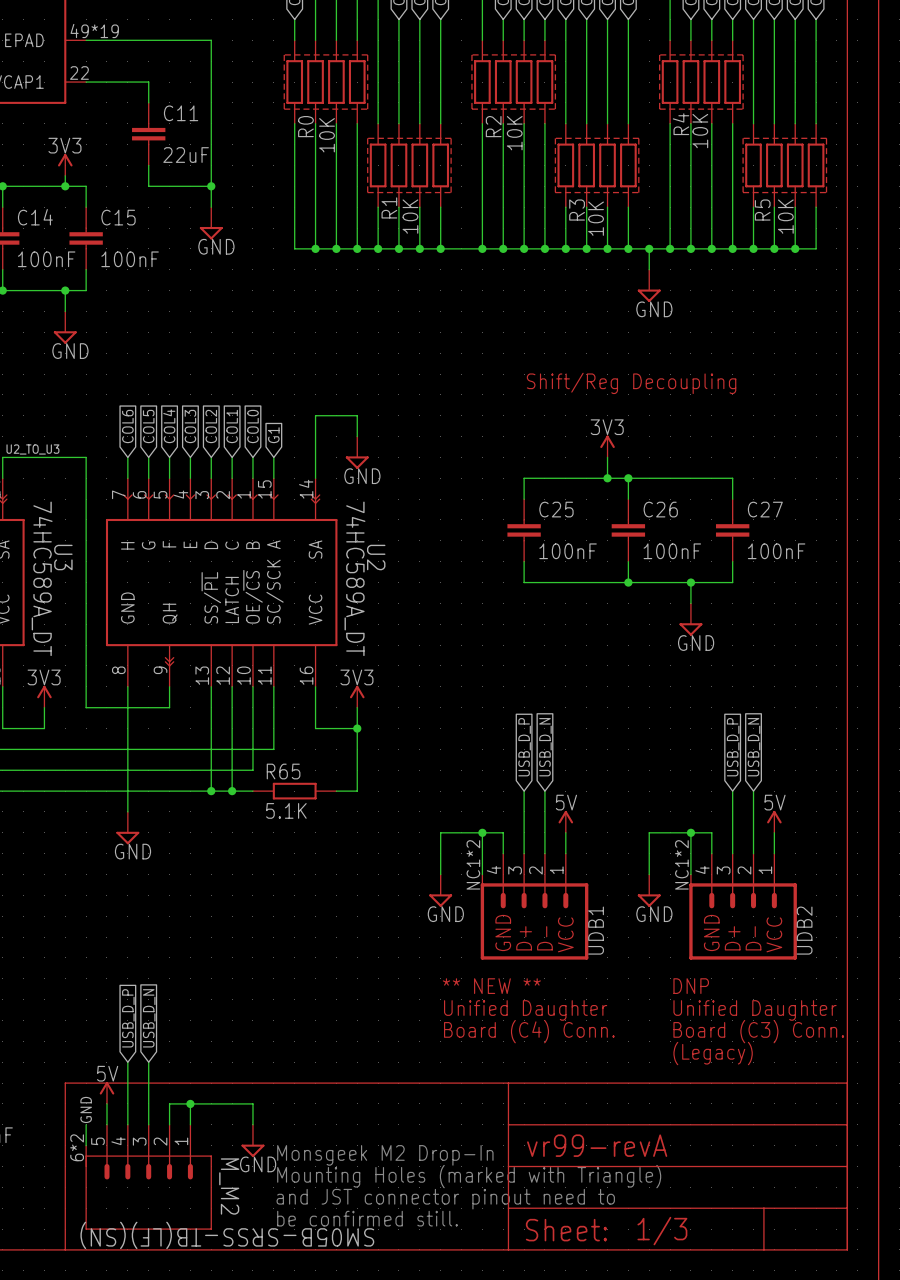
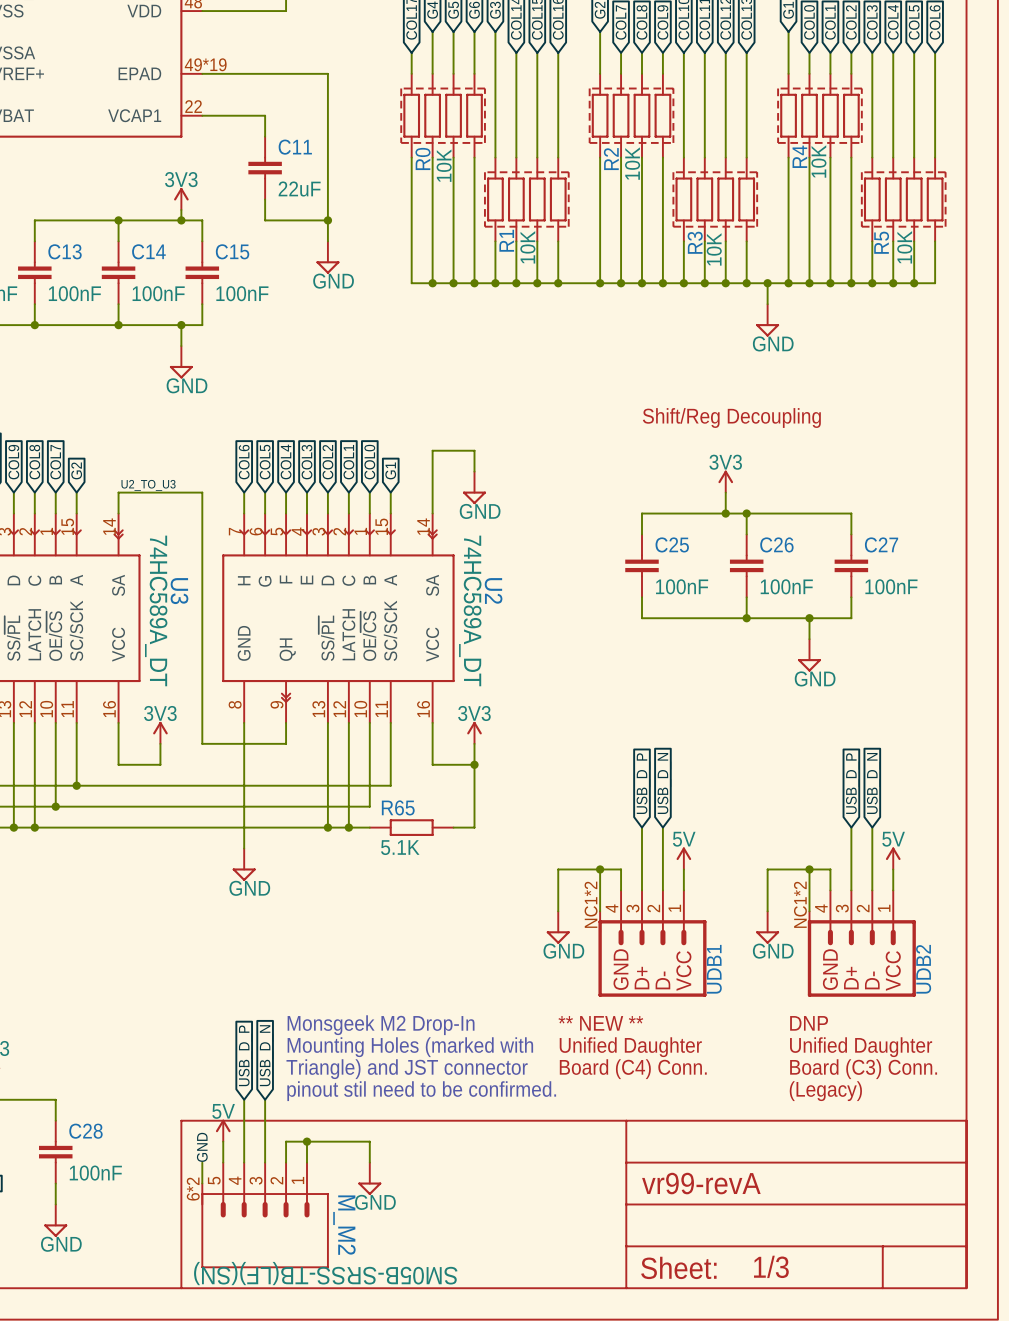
text: none -> Mounting Holes (marked with (410, 1047)
text: none -> Triangle) and JST connector (407, 1069)
text: none -> pinout stil need to be confirmed. (421, 1091)
text position: Monsgeek M2 Drop-In (385, 1155) -> Monsgeek M2 Drop-In (381, 1025)
text: Mounting Holes (marked with Triangle) (469, 1176) -> none
text: and JST connector pinout need to (445, 1199) -> none
text: be confirmed still. (367, 1218) -> none

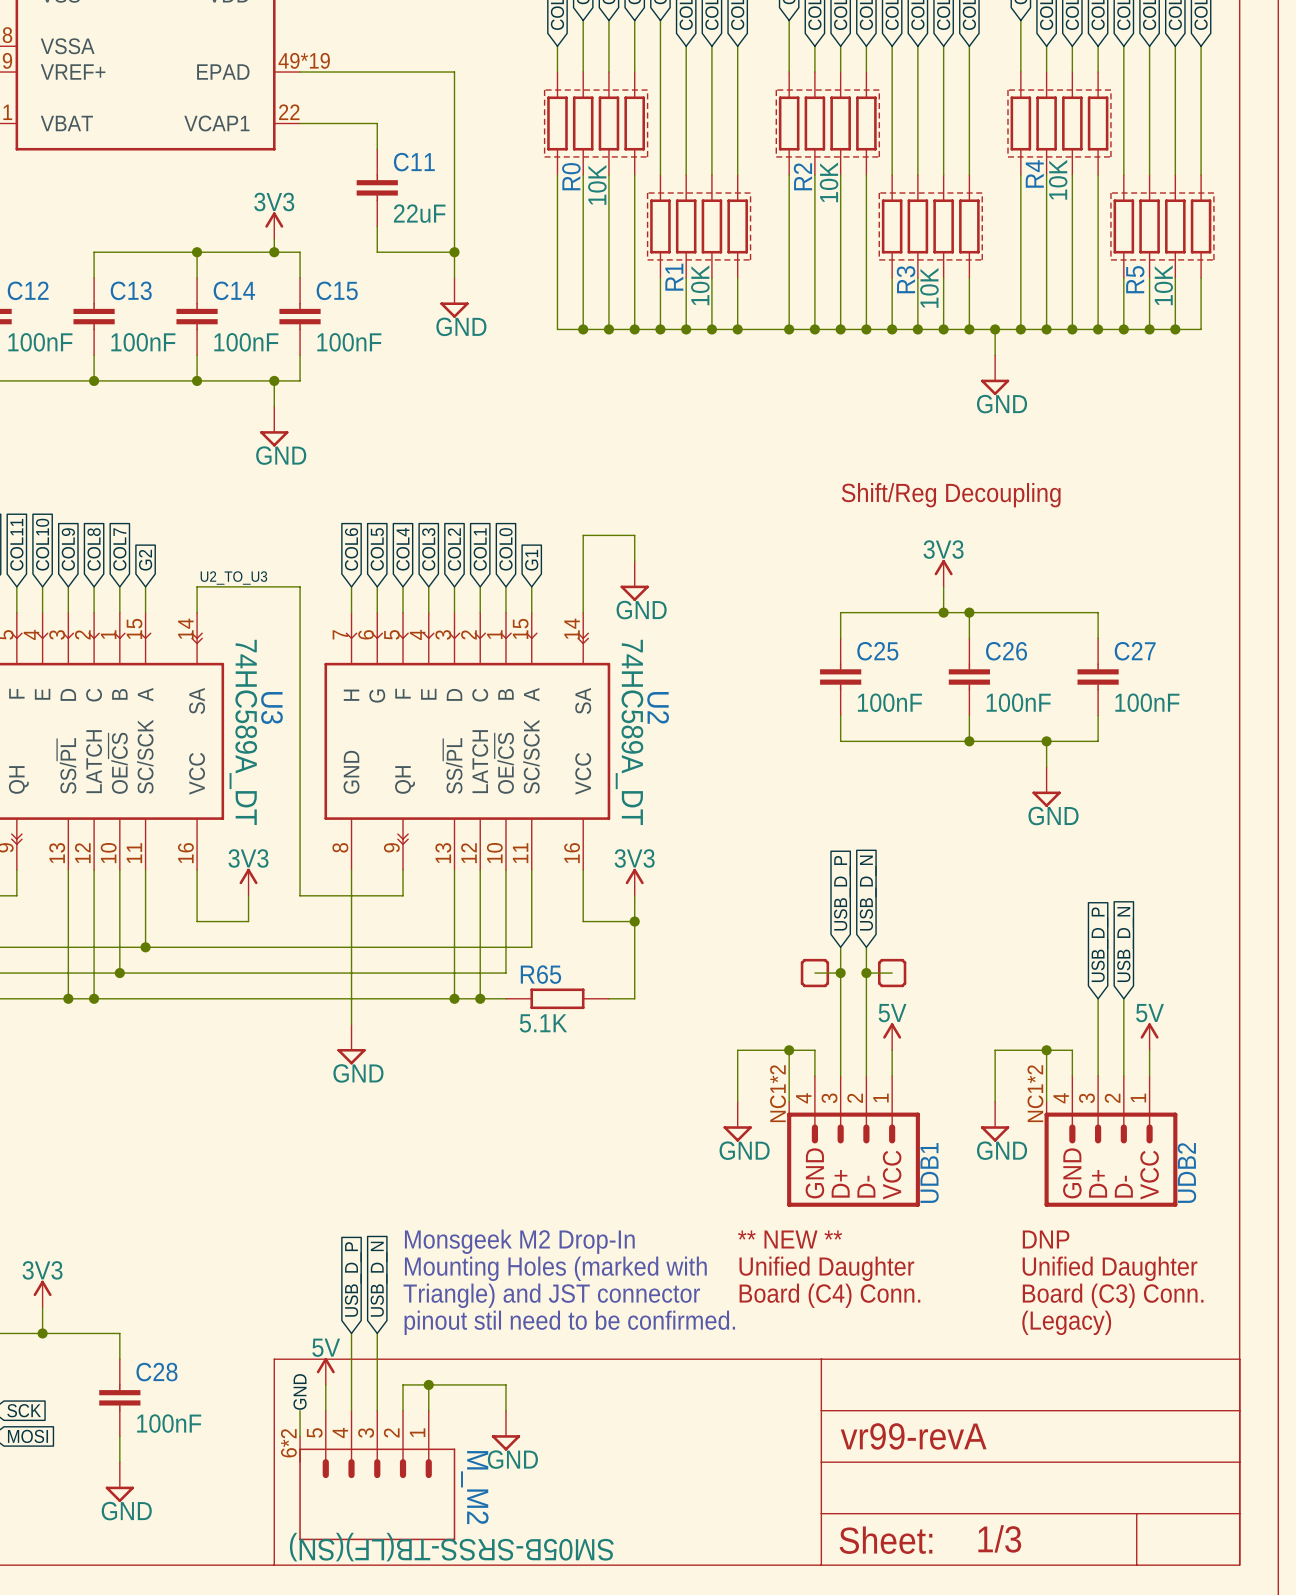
global label position: USB_D_P (643, 783) -> USB_D_P (842, 893)
global label position: USB_D_N (664, 783) -> USB_D_N (868, 893)
wire: none -> (840, 947) (840, 998)
wire: none -> (866, 947) (866, 998)
wire: none -> (814, 973) (840, 973)
part: none -> (814, 973)
junction: none -> (840, 973)
wire: none -> (866, 973) (892, 973)
junction: none -> (866, 973)
part: none -> (892, 973)

